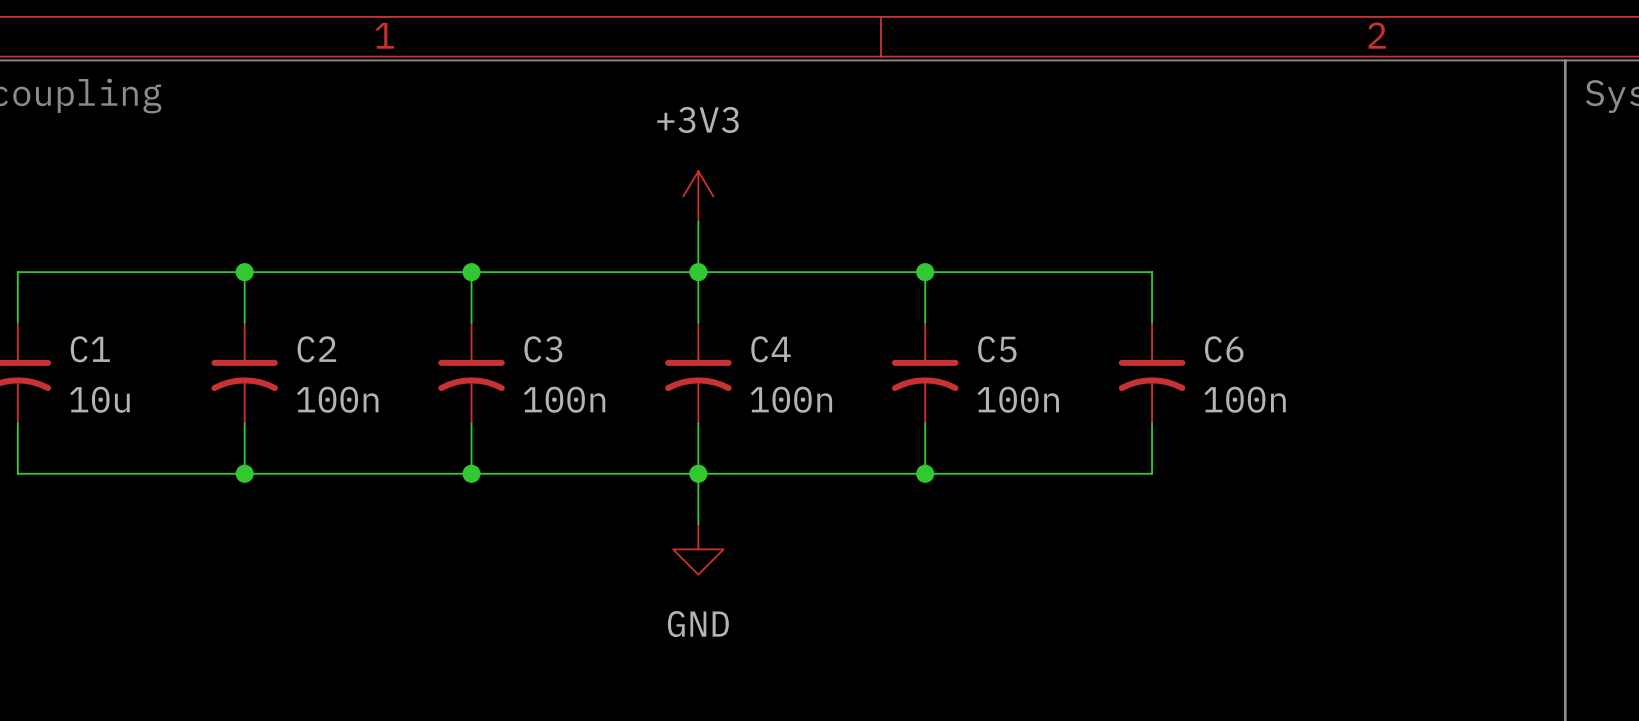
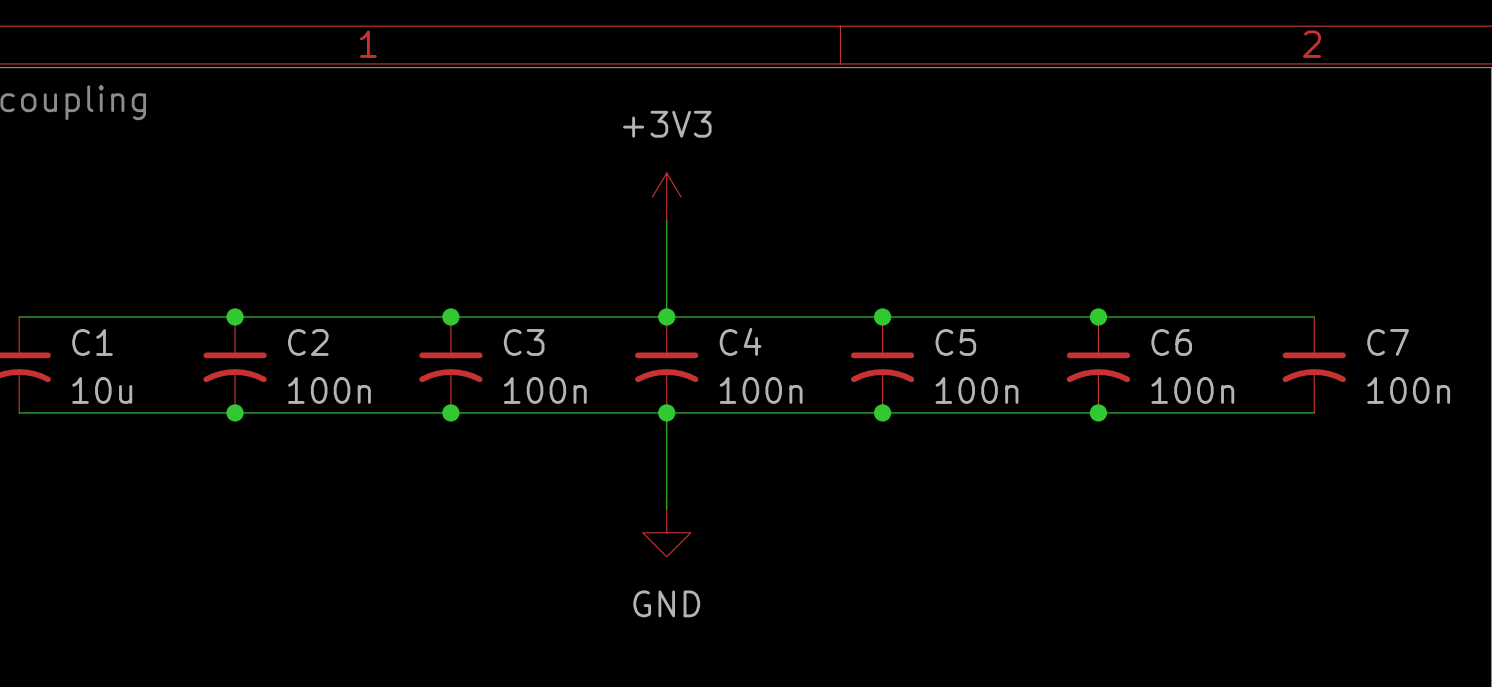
wire: (244, 272) (244, 322) -> none
junction position: (244, 272) -> (235, 316)
wire: (471, 272) (471, 322) -> none
junction position: (471, 272) -> (450, 316)
junction position: (698, 272) -> (666, 316)
wire: (925, 272) (925, 322) -> none
junction position: (925, 272) -> (882, 316)
wire: (17, 322) (17, 272) (1152, 272) (1152, 322) -> (19, 316) (1314, 316)
junction: none -> (1098, 316)
C7: none -> 100n (1314, 364)
wire: (17, 423) (17, 473) (1152, 473) (1152, 423) -> (19, 412) (1314, 412)
wire: (244, 423) (244, 473) -> none
wire: (471, 423) (471, 473) -> none
wire: (925, 423) (925, 473) -> none
junction: none -> (1098, 412)
junction position: (244, 473) -> (235, 412)
junction position: (471, 473) -> (450, 412)
junction position: (698, 473) -> (666, 412)
junction position: (925, 473) -> (882, 412)

